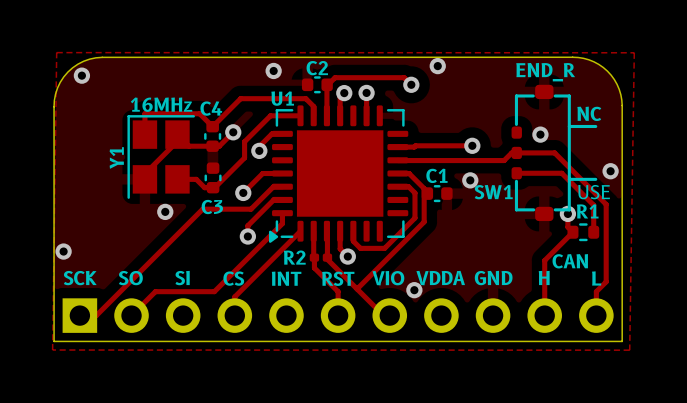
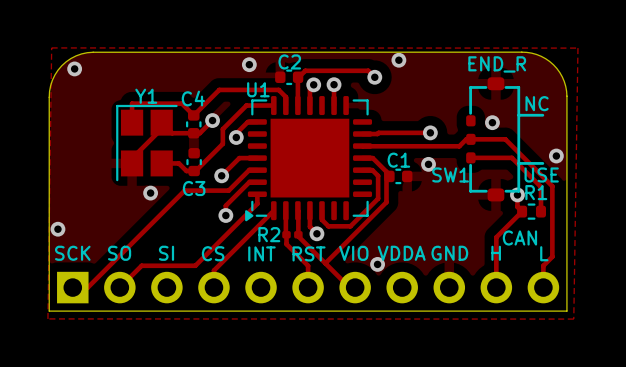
Y1 value: 16MHz (161, 104) -> none
Y1 name rotation: 0° (116, 158) -> 90° clockwise (146, 96)
Y1 name position: Y1 (116, 158) -> Y1 (146, 96)

